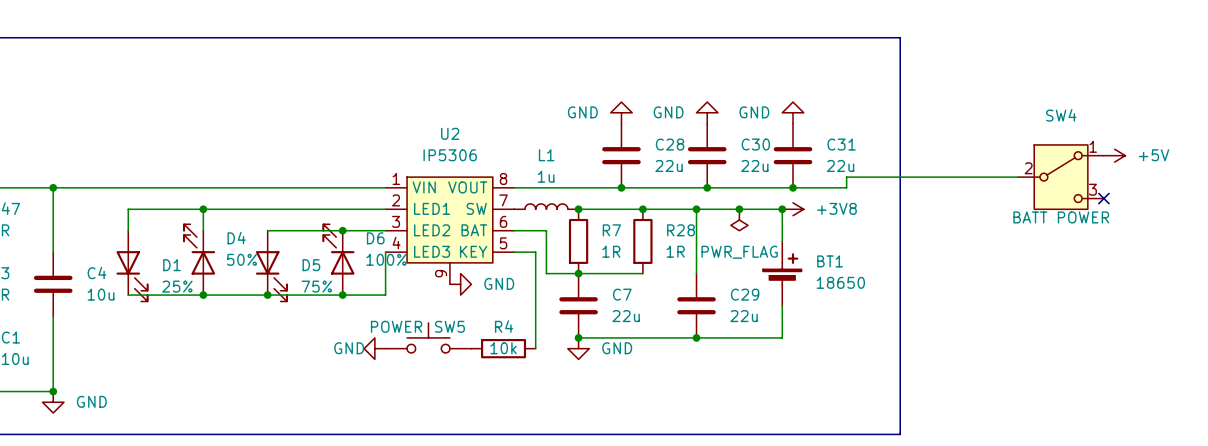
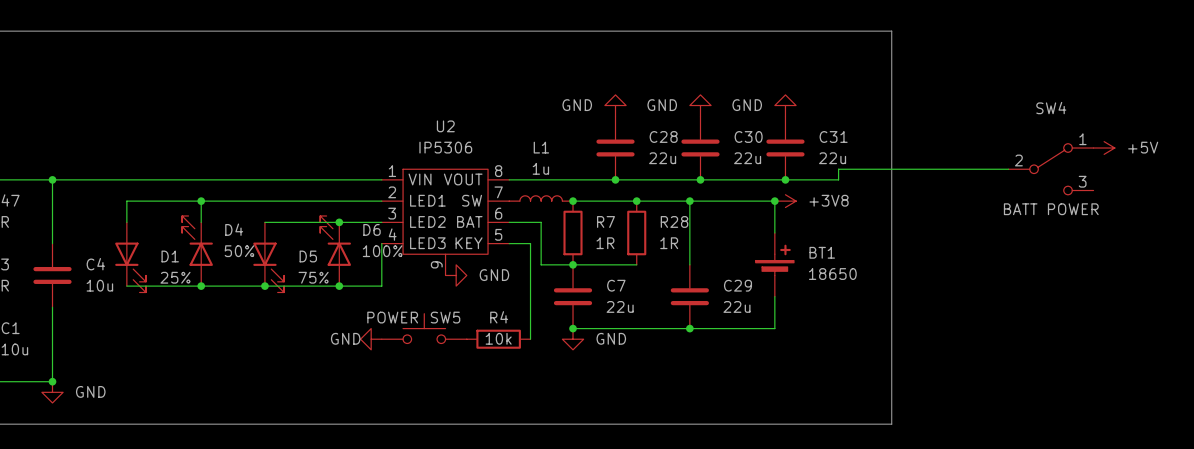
SW4 symbol: [1018, 144, 1104, 210] -> [1008, 143, 1094, 195]
no-connect mark: (1103, 198) -> none
junction: (739, 209) -> none
power symbol: PWR_FLAG (739, 220) -> none

